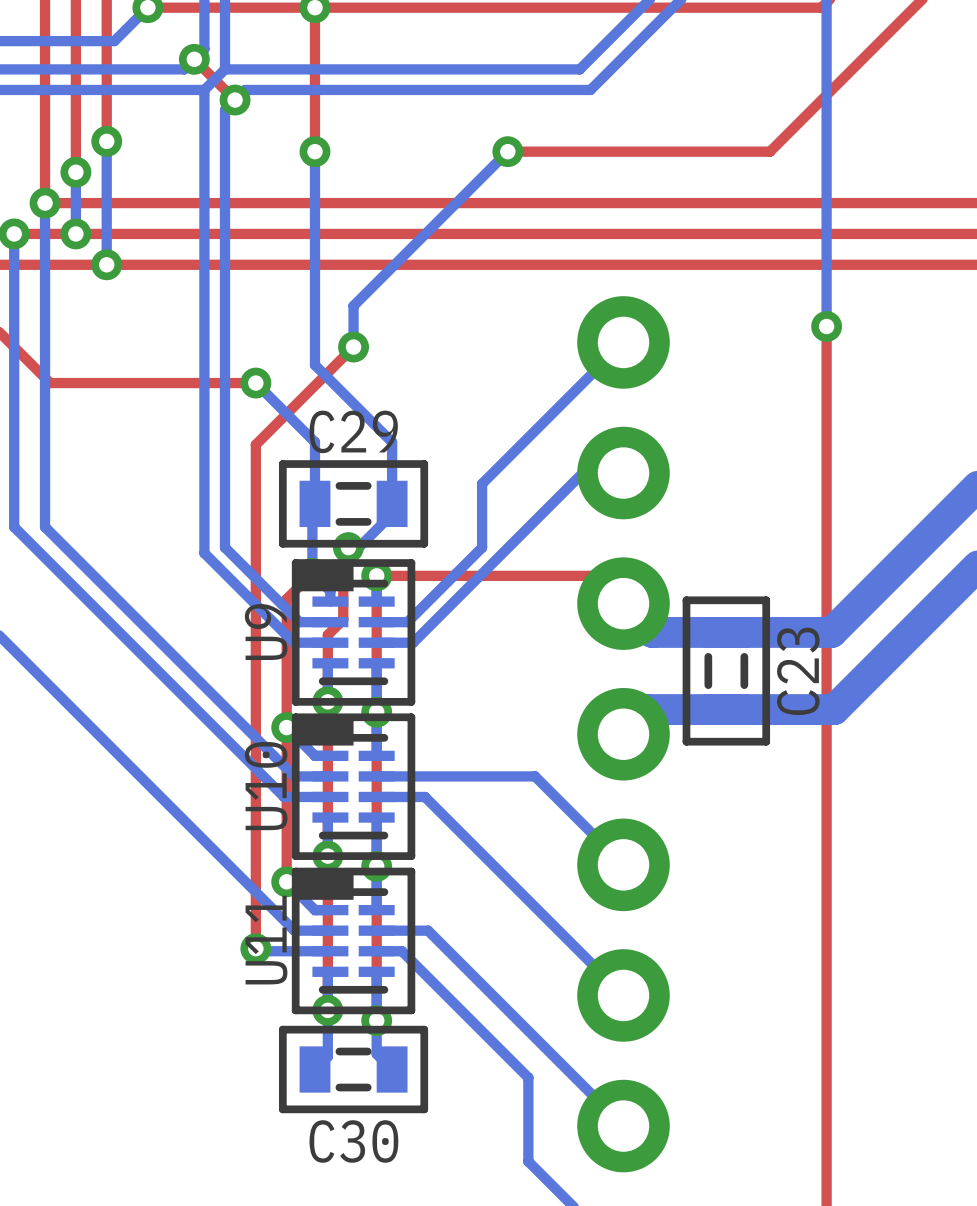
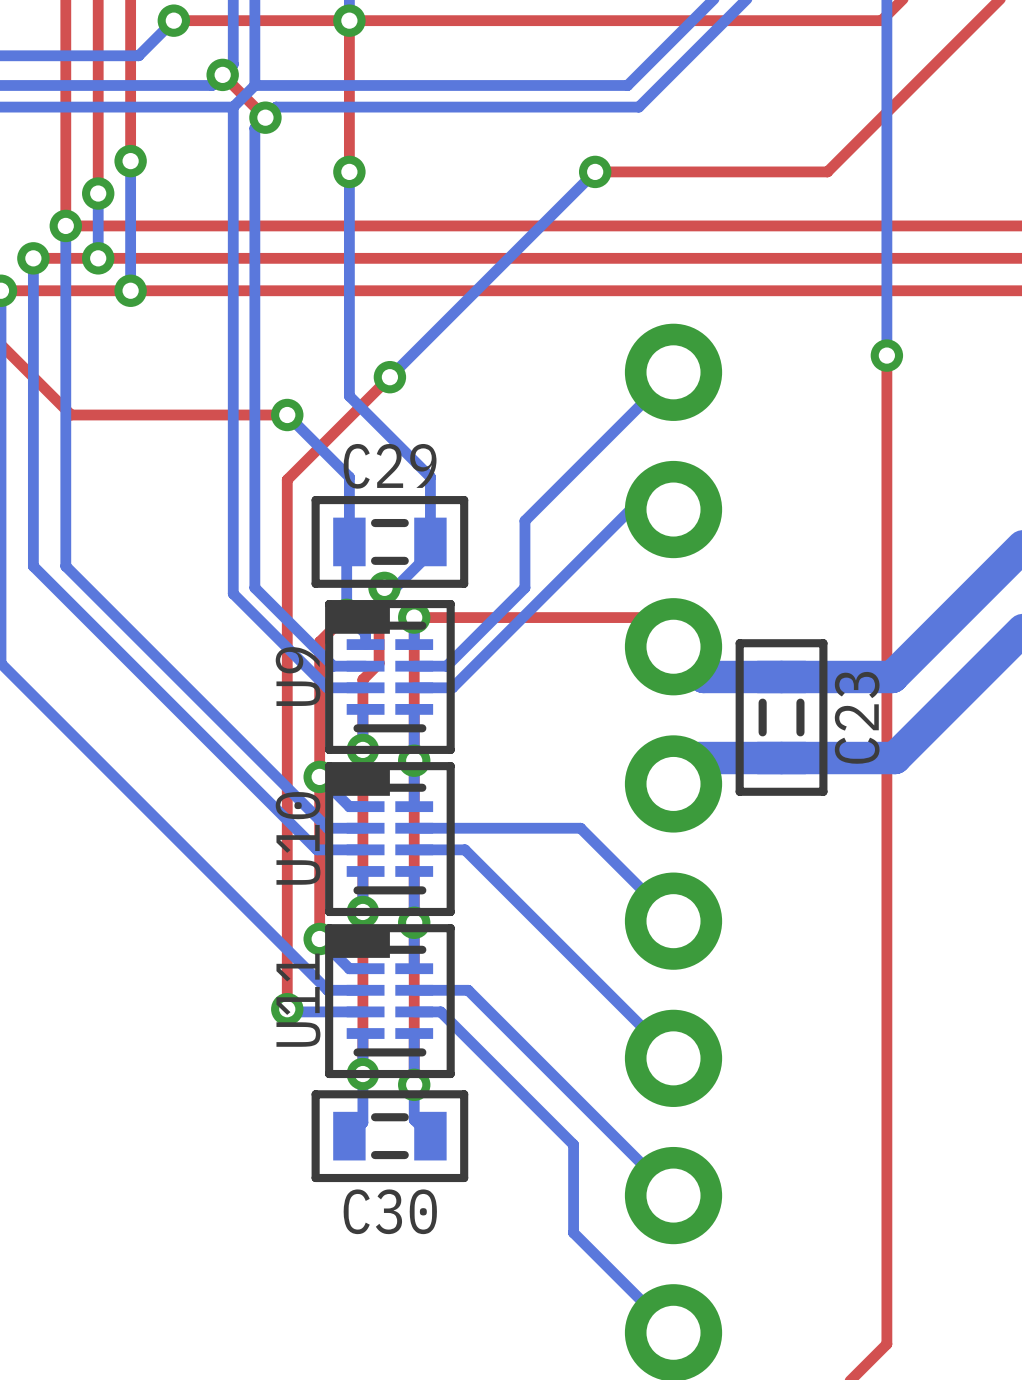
bottom track: (507, 151) (353, 305) (353, 347) -> (595, 171) (389, 377)
via position: (507, 151) -> (595, 171)
top track: (548, 151) (507, 151) -> none

